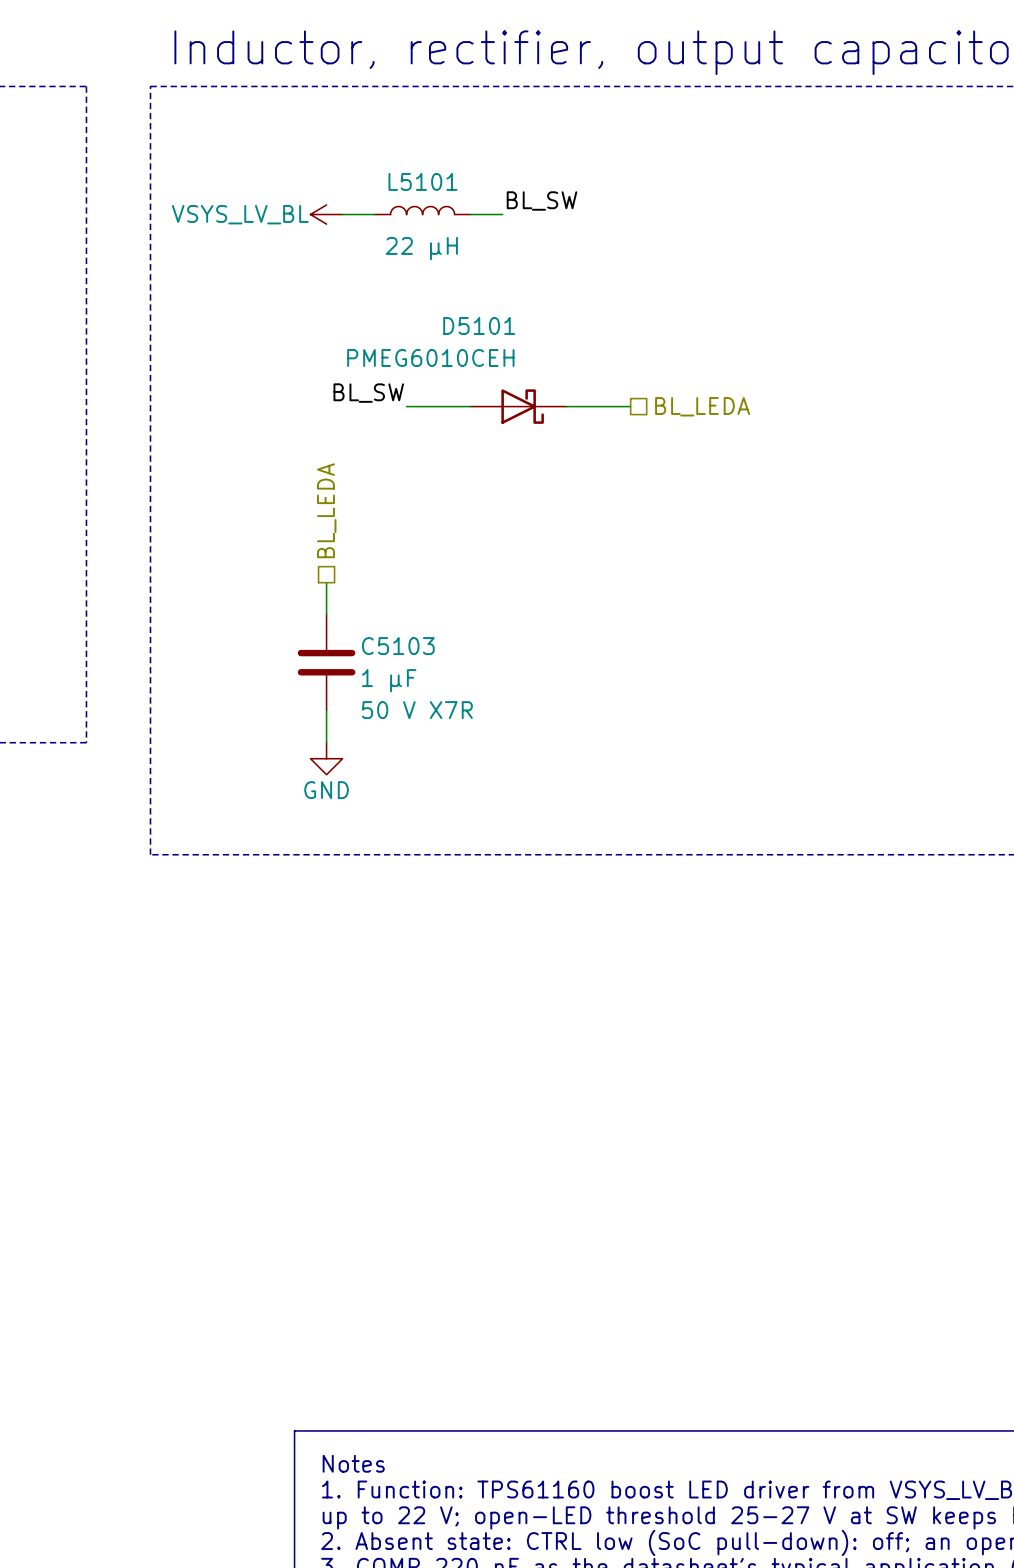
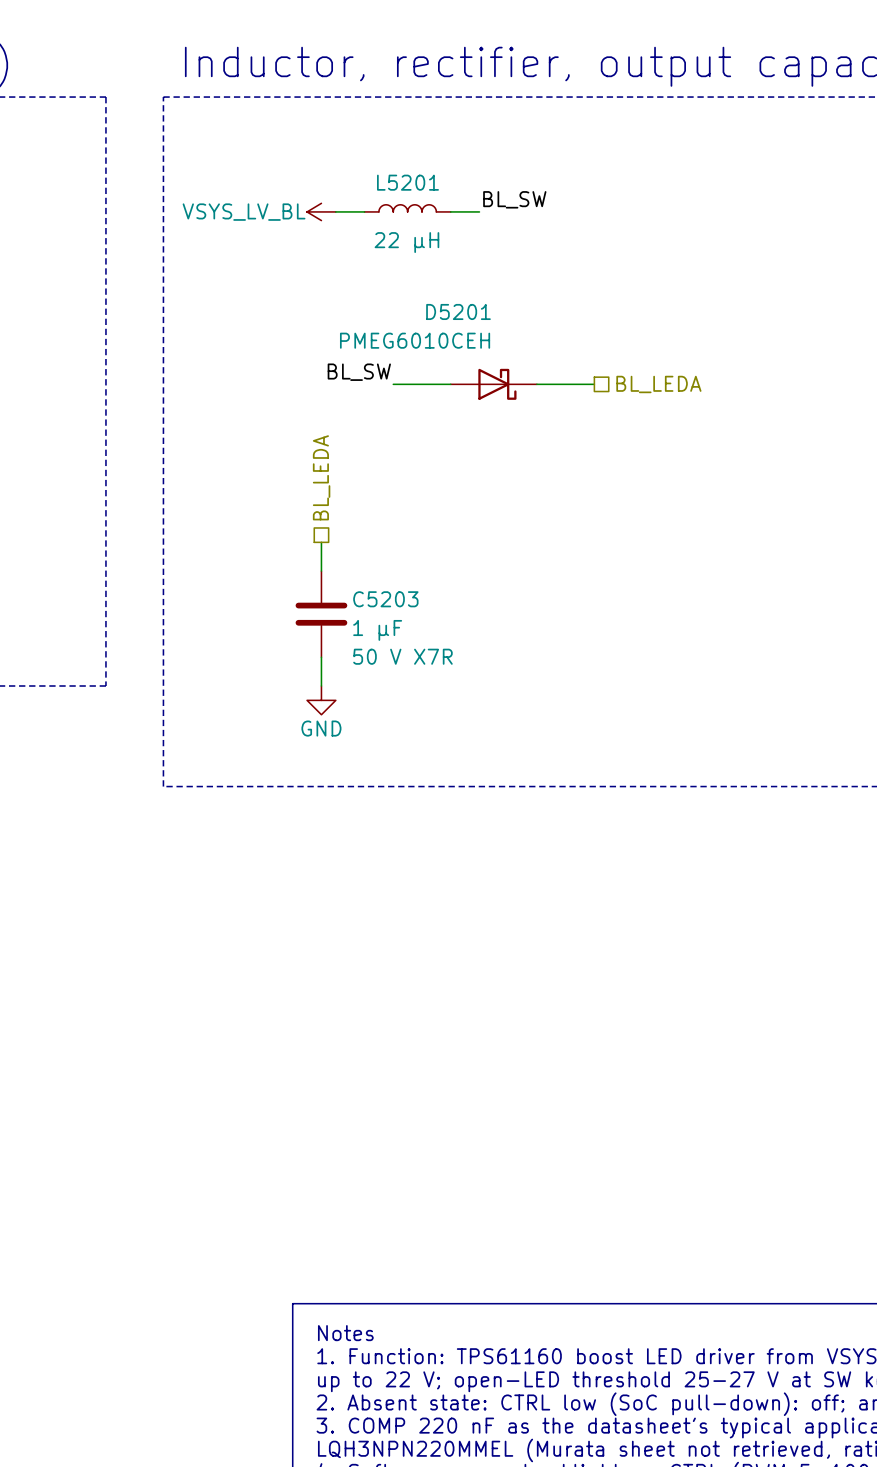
L5101 name: L5101 (422, 181) -> L5201 (407, 182)
D5101 name: D5101 (479, 325) -> D5201 (458, 311)
C5103 name: C5103 (398, 646) -> C5203 (385, 599)

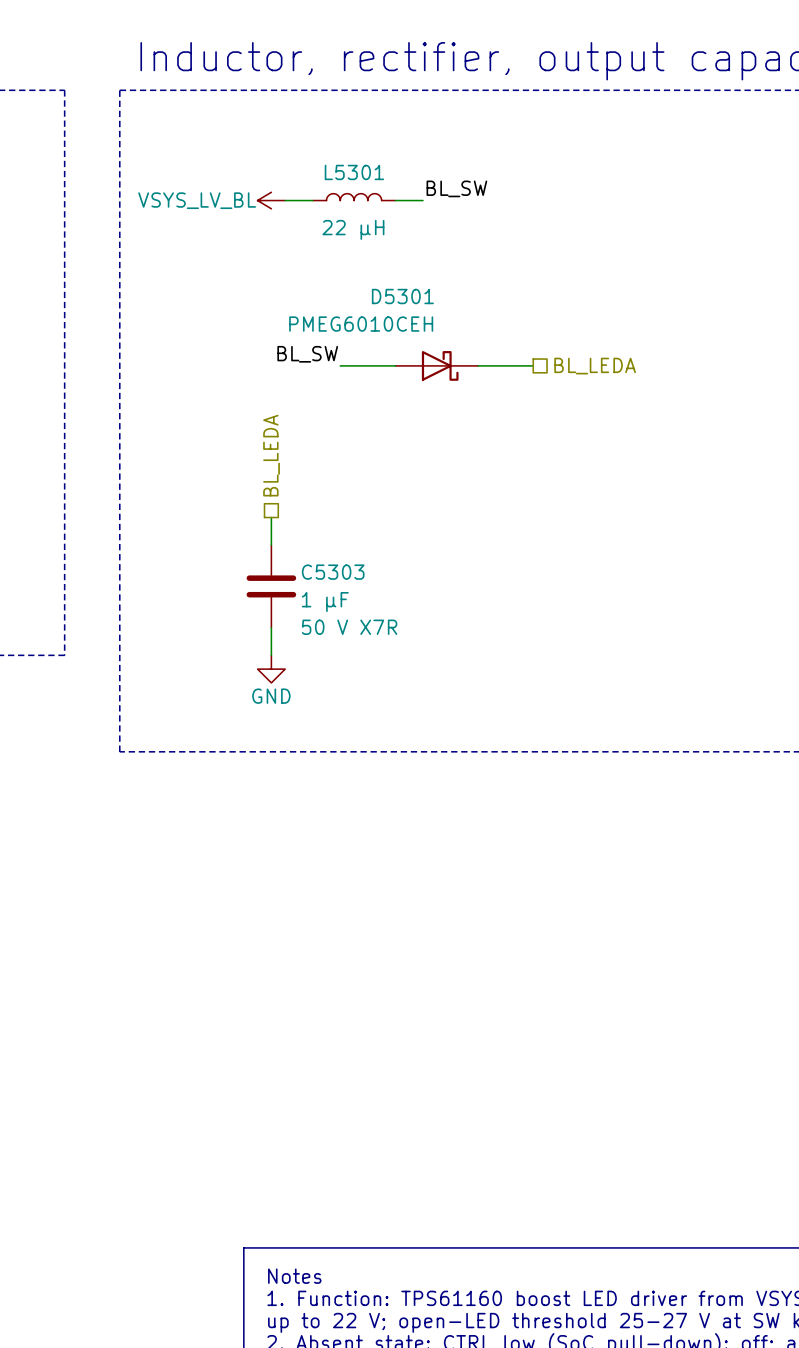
L5201 name: L5201 (407, 182) -> L5301 (354, 172)
D5201 name: D5201 (458, 311) -> D5301 (402, 296)
C5203 name: C5203 (385, 599) -> C5303 (333, 572)

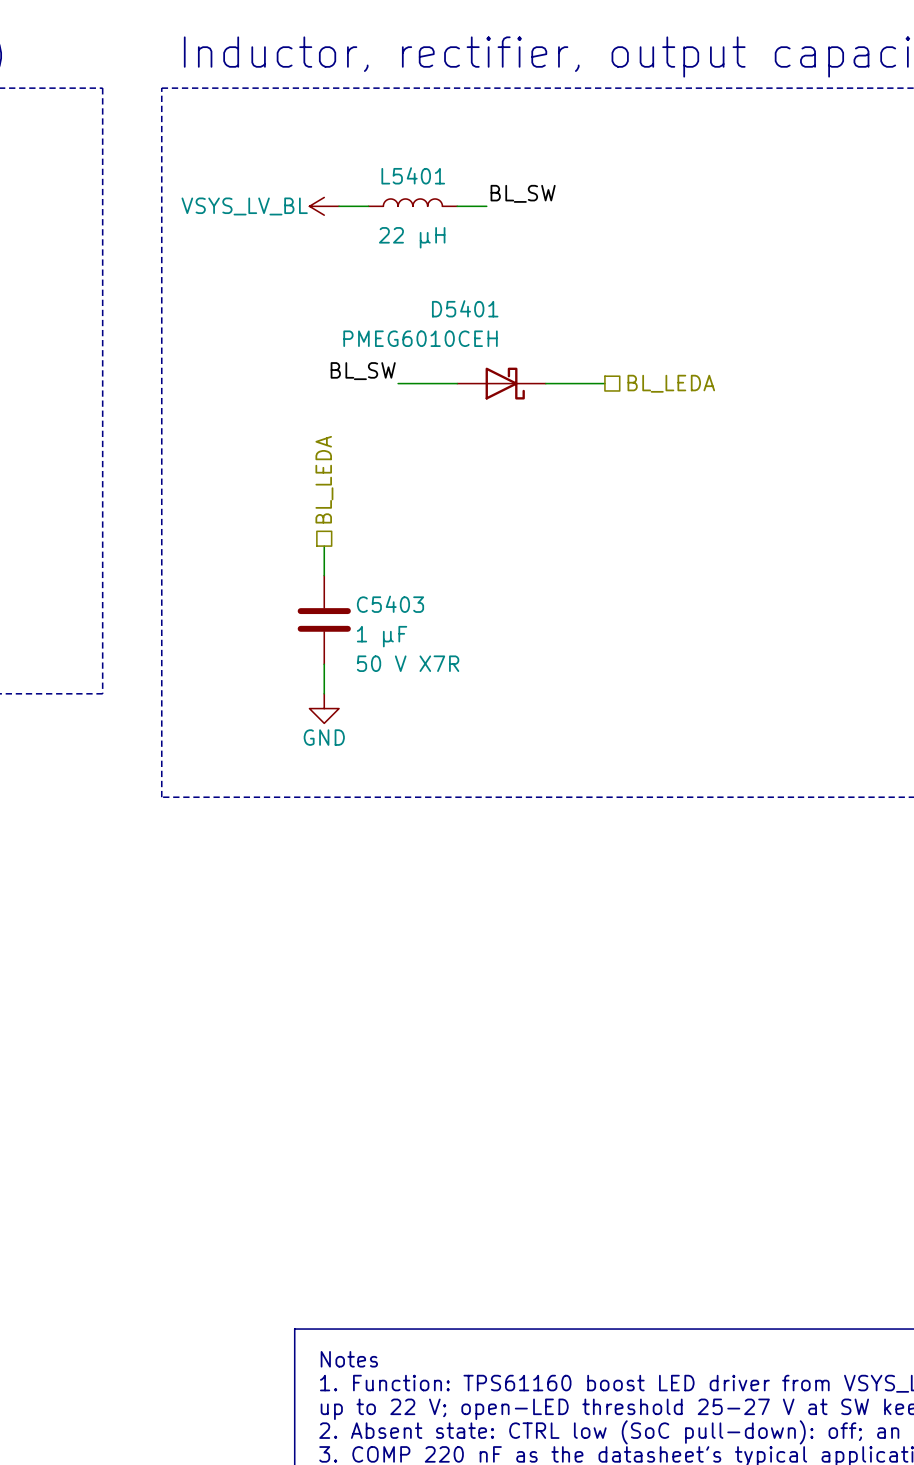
L5301 name: L5301 (354, 172) -> L5401 (413, 175)
D5301 name: D5301 (402, 296) -> D5401 (465, 308)
C5303 name: C5303 (333, 572) -> C5403 (390, 604)

